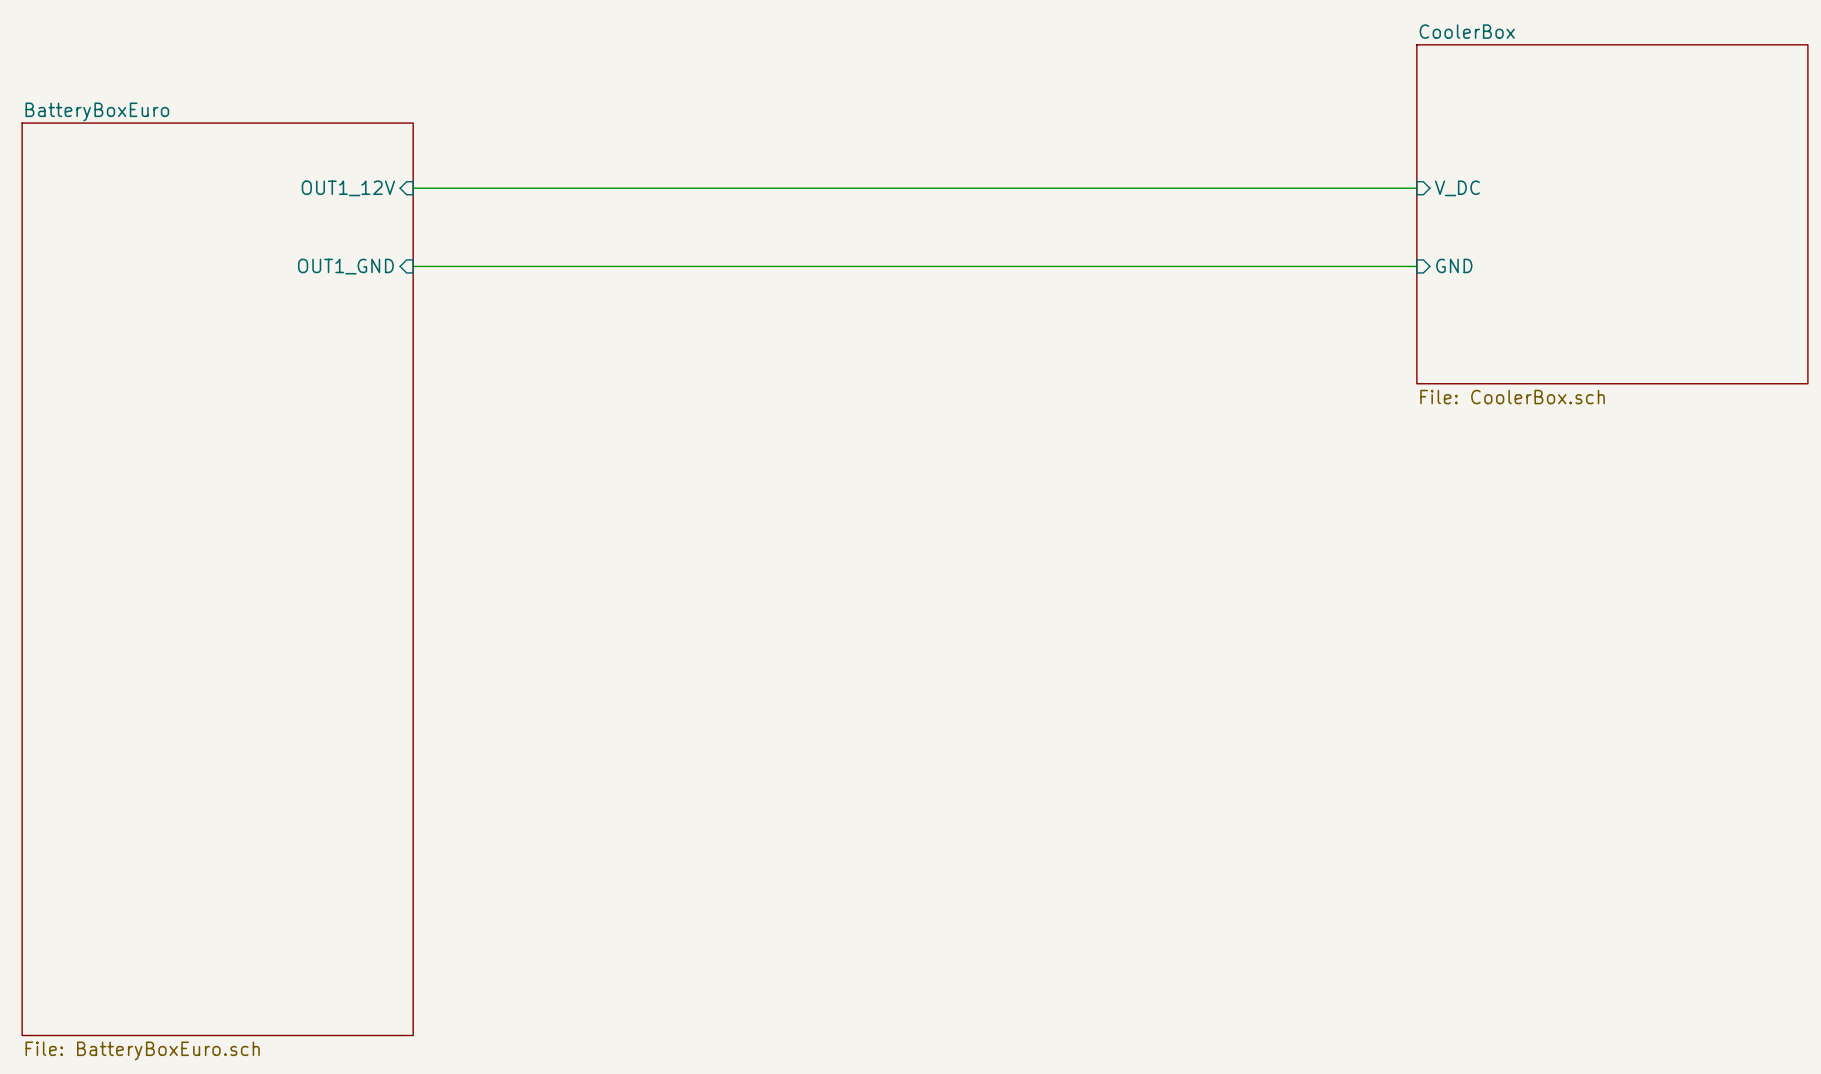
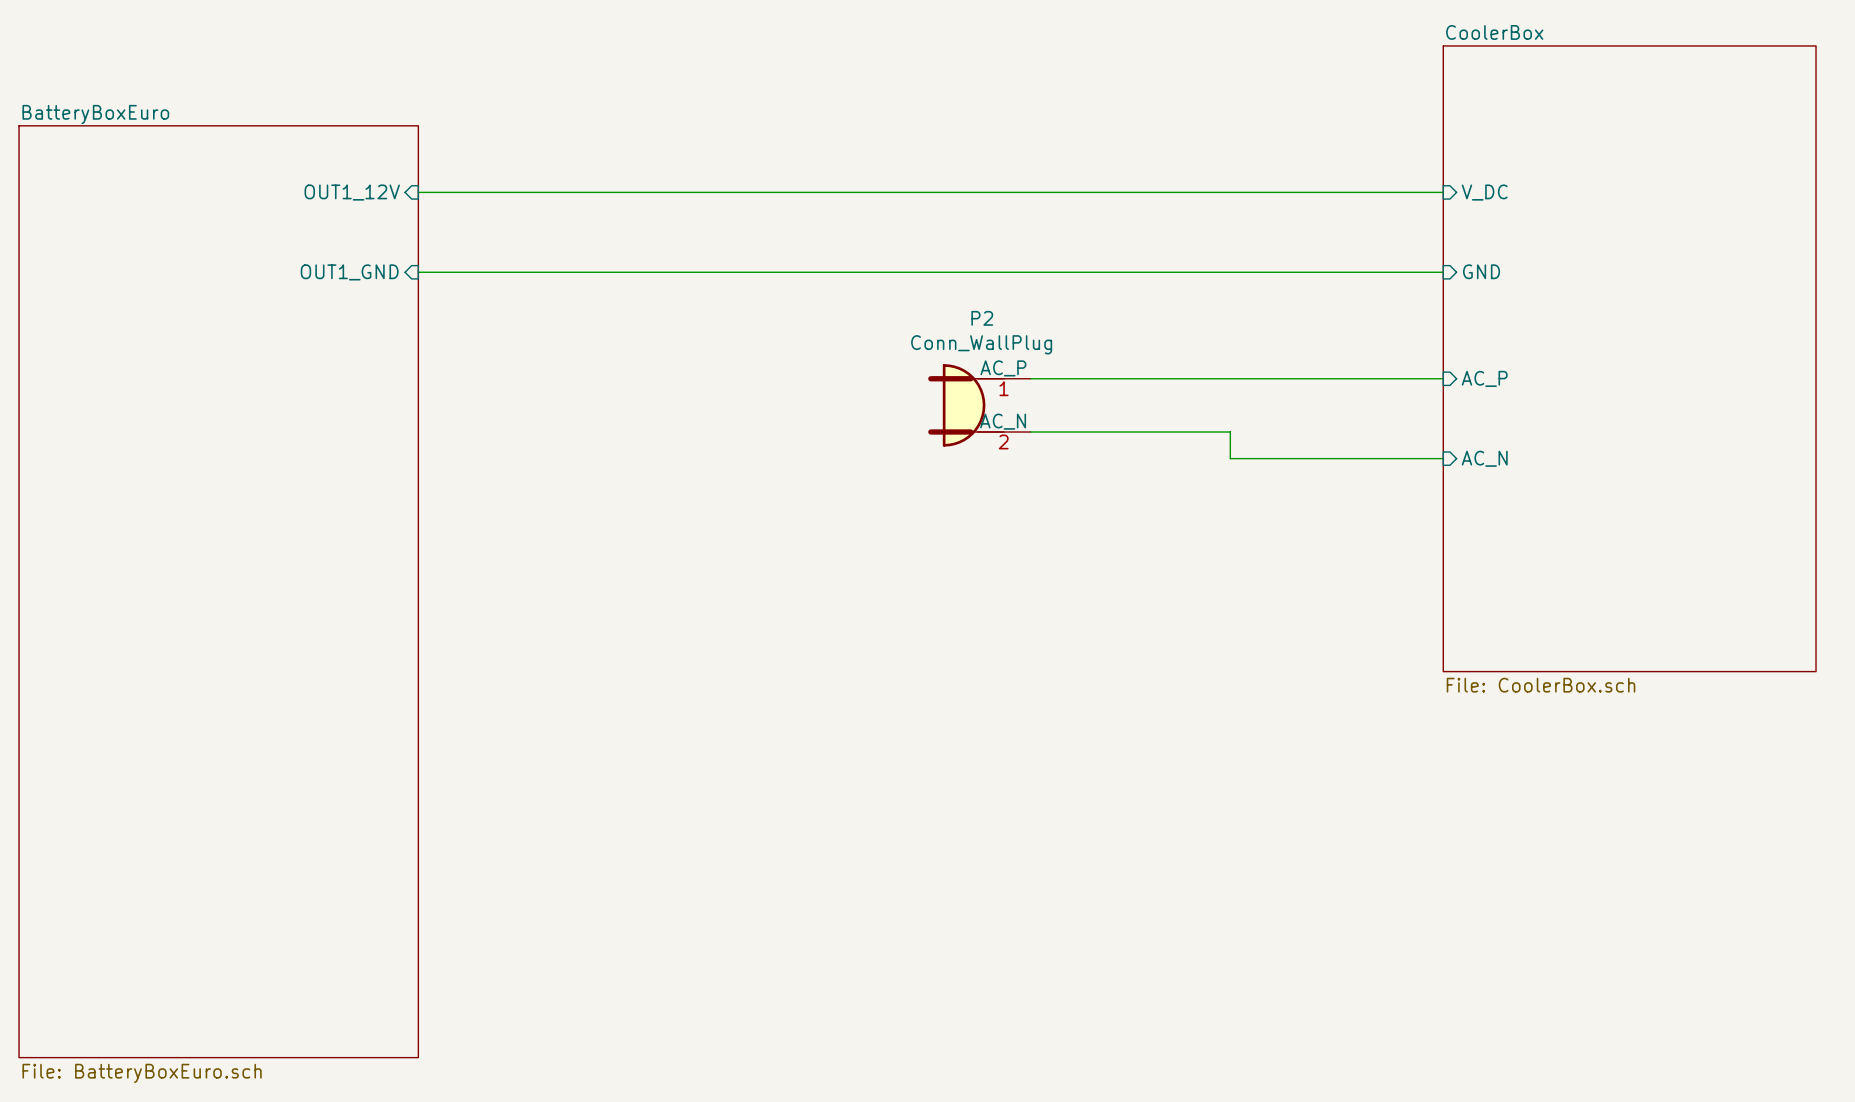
sheet CoolerBox: File: CoolerBox.sch (1612, 214) -> none
sheet CoolerBox: none -> File: CoolerBox.sch (1629, 358)
wire: none -> (1030, 378) (1443, 378)
sheet pin: none -> AC_P (1484, 378)
P2: none -> Conn_WallPlug (979, 405)
wire: none -> (1030, 432) (1230, 432) (1230, 458) (1443, 458)
sheet pin: none -> AC_N (1484, 458)

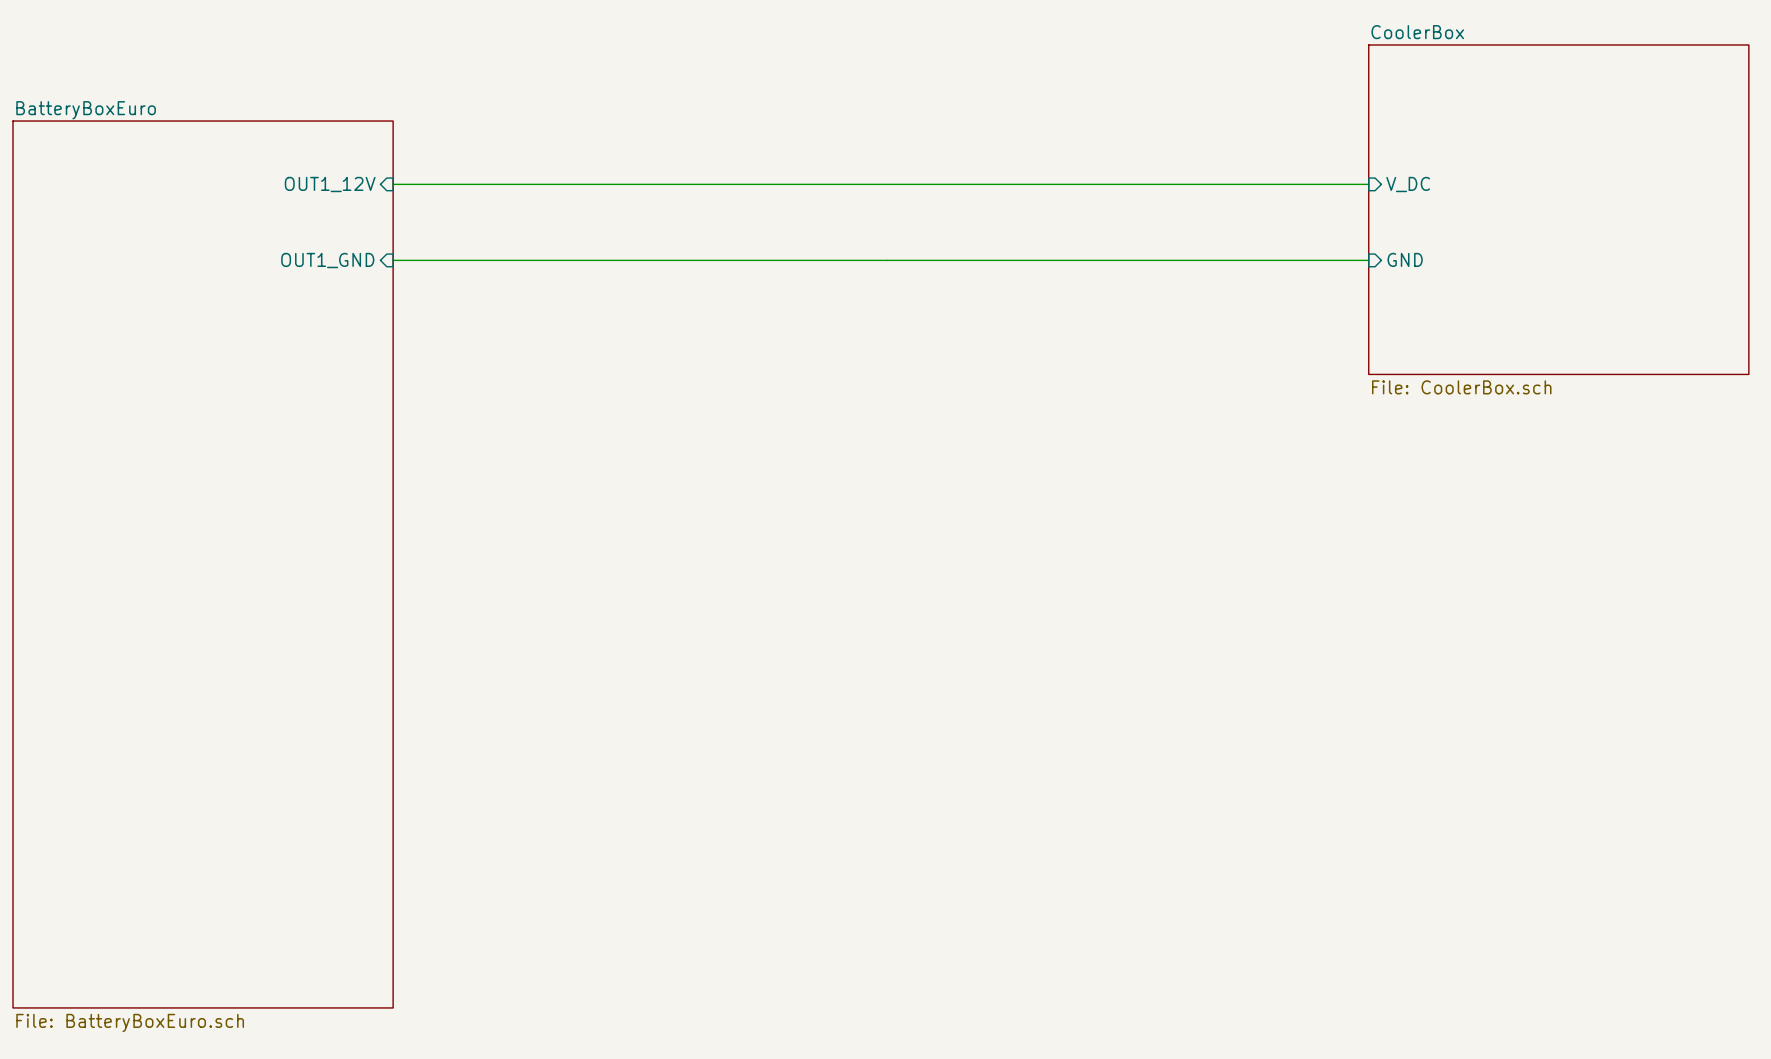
sheet CoolerBox: none -> File: CoolerBox.sch (1558, 209)
sheet CoolerBox: File: CoolerBox.sch (1629, 358) -> none
wire: (1030, 378) (1443, 378) -> none
sheet pin: AC_P (1484, 378) -> none
P2: Conn_WallPlug (979, 405) -> none
wire: (1030, 432) (1230, 432) (1230, 458) (1443, 458) -> none
sheet pin: AC_N (1484, 458) -> none

